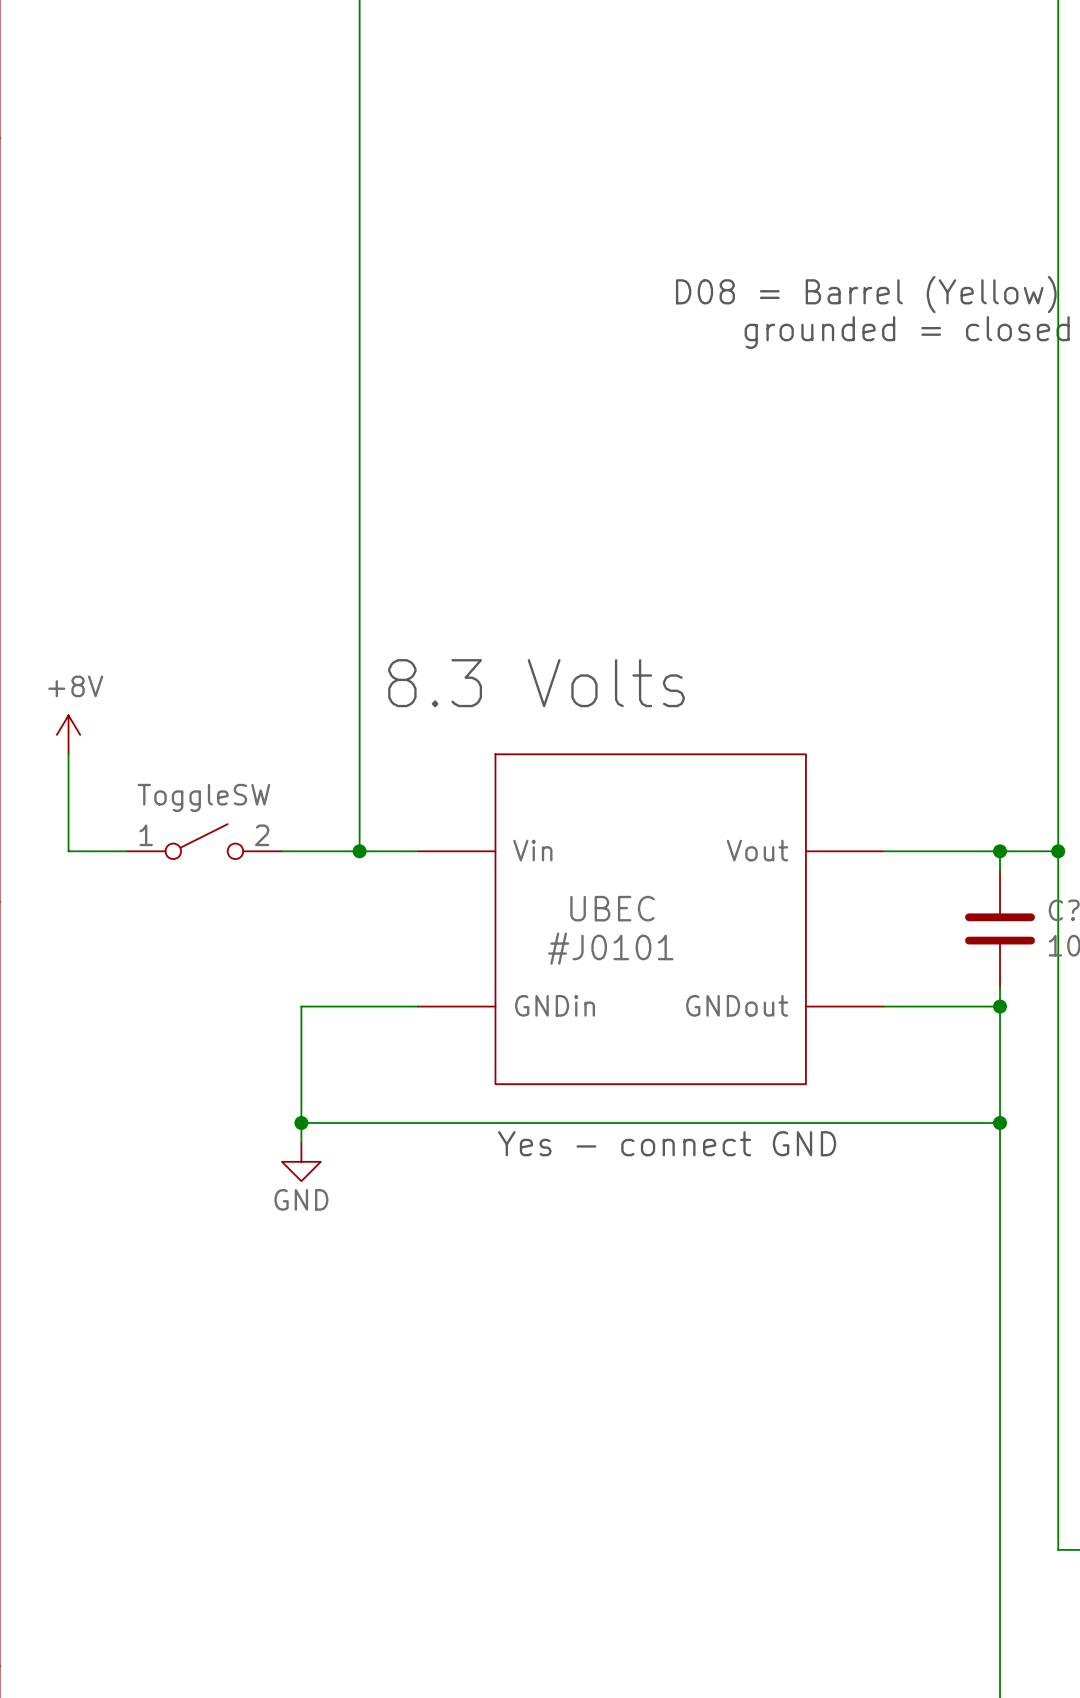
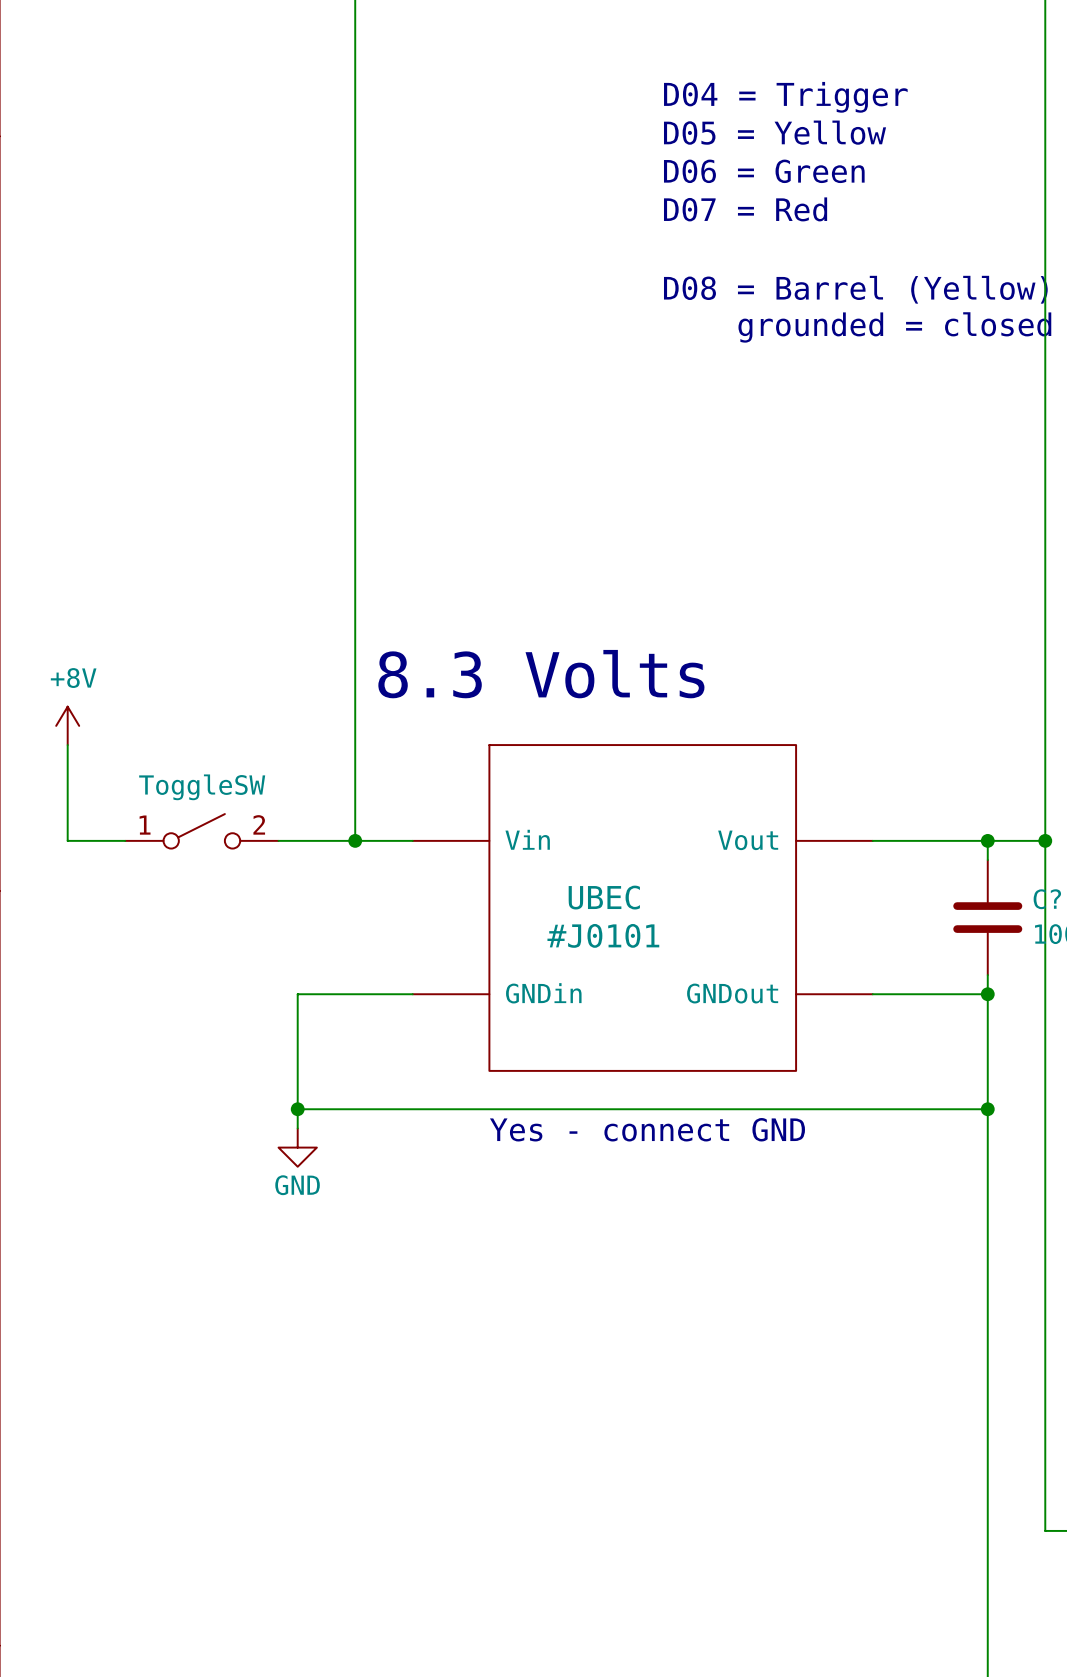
text: none -> D04 = Trigger (785, 97)
text: none -> D05 = Yellow (775, 132)
text: none -> D06 = Green (764, 171)
text: none -> D07 = Red (745, 209)

